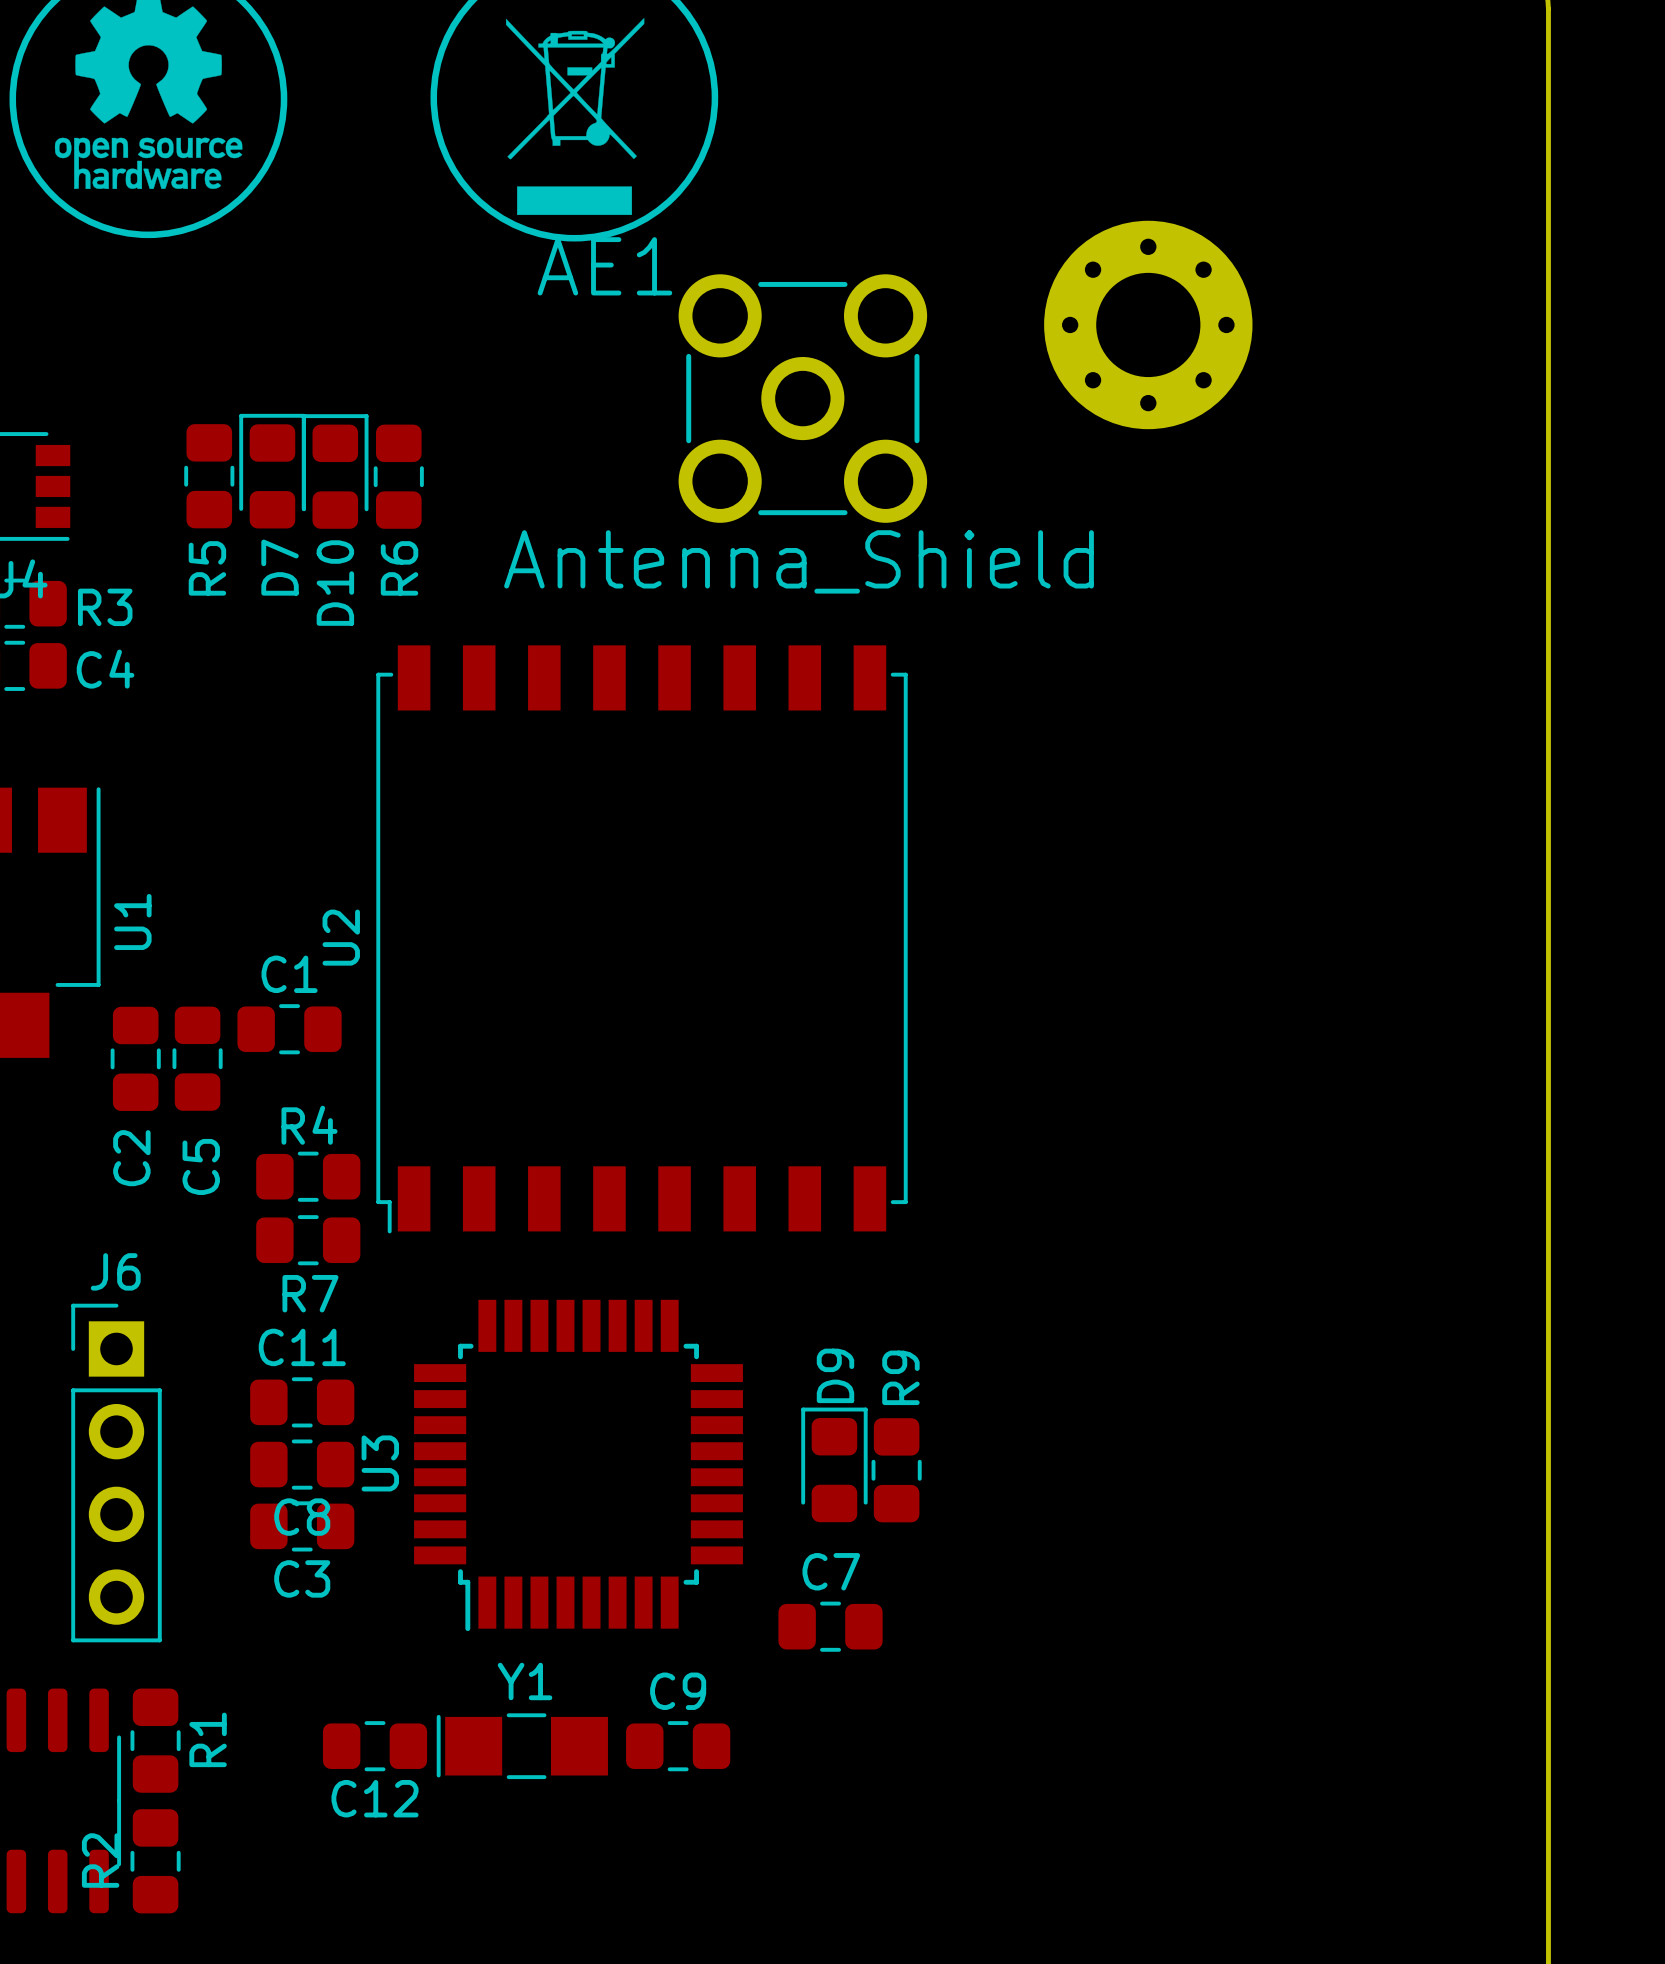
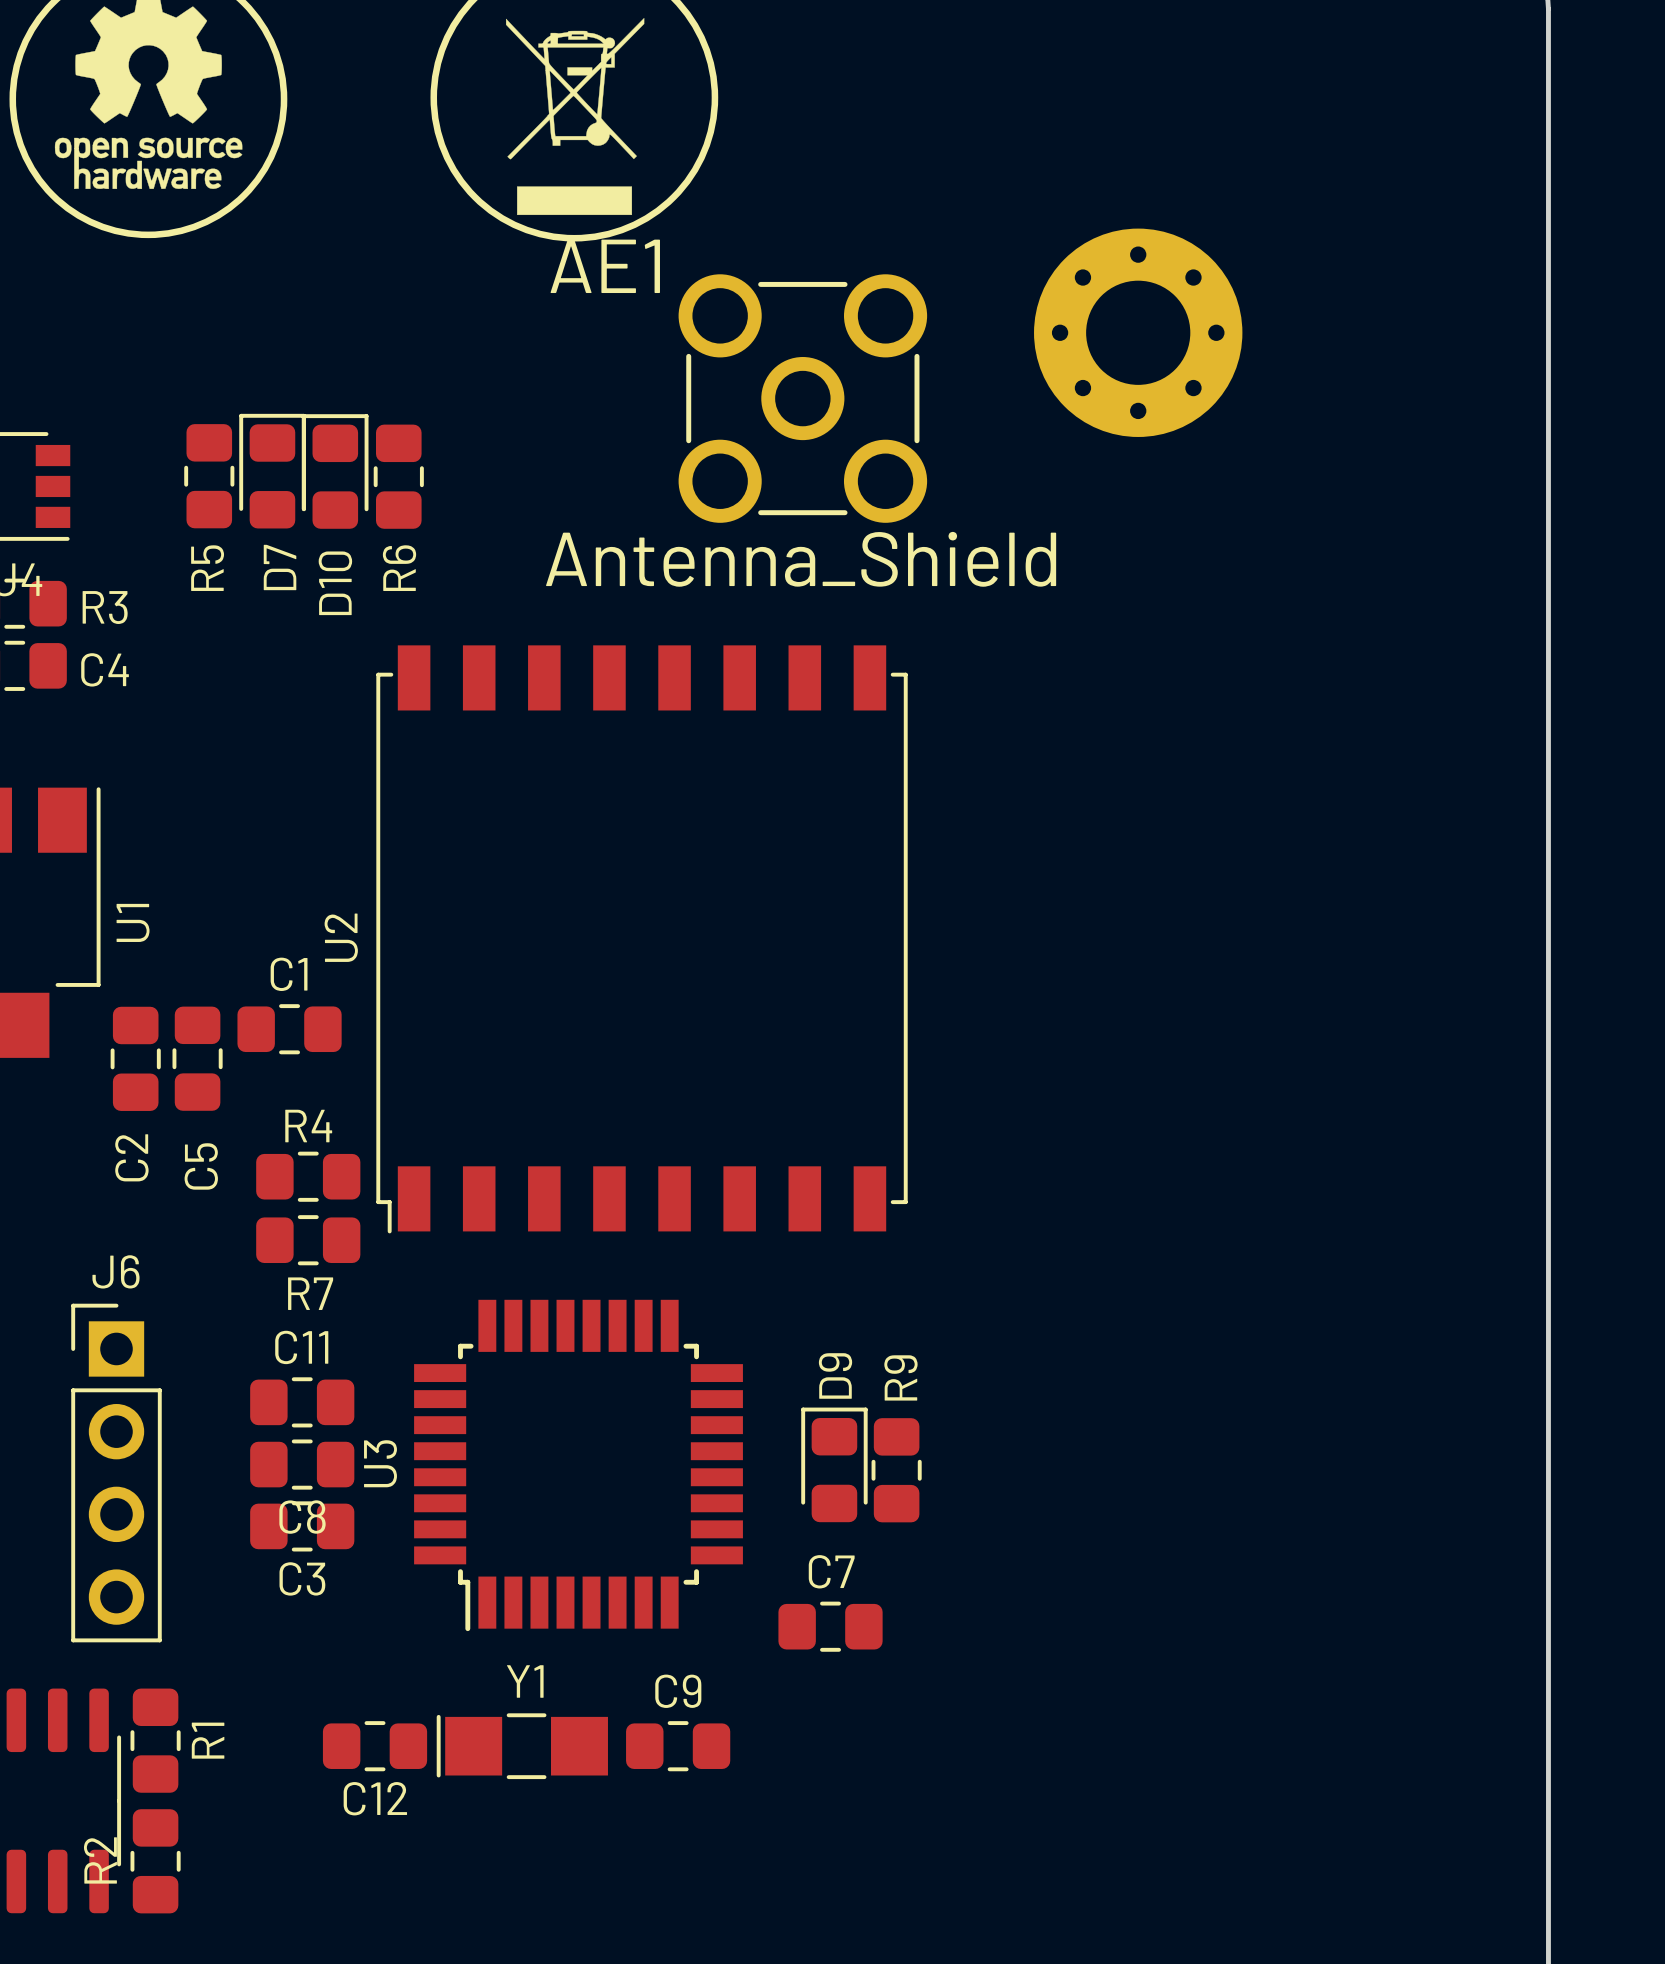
part position: (1148, 324) -> (1138, 332)

